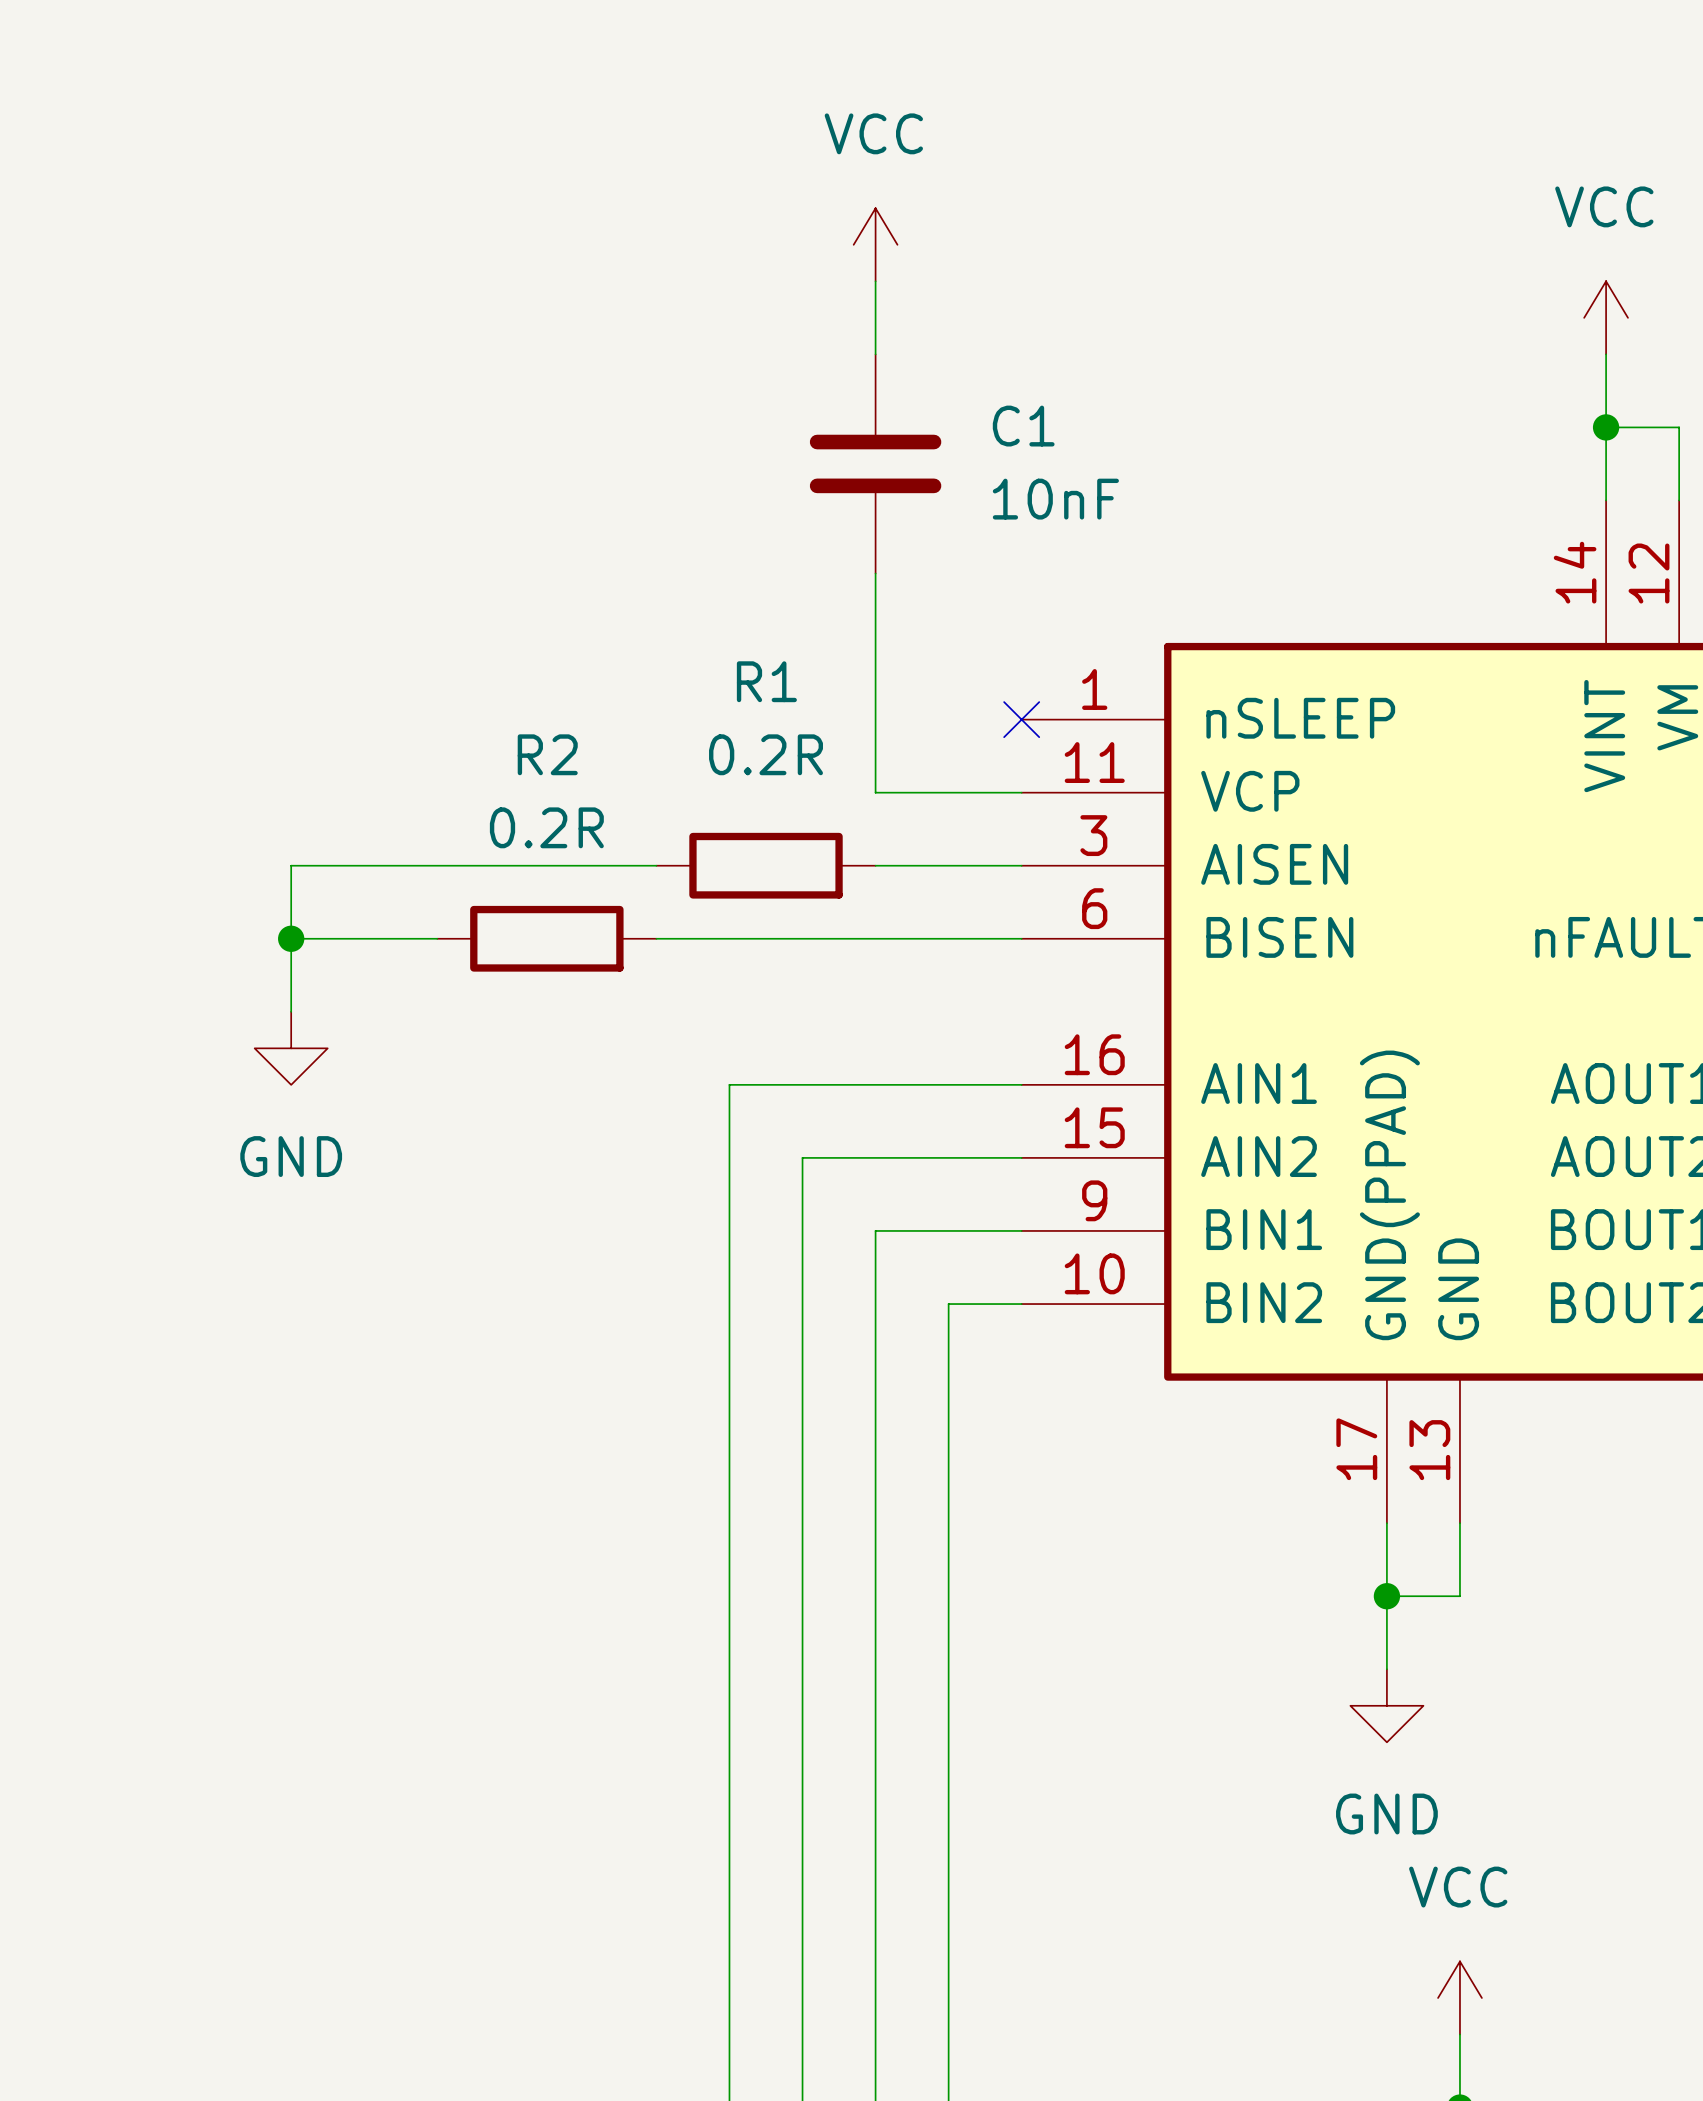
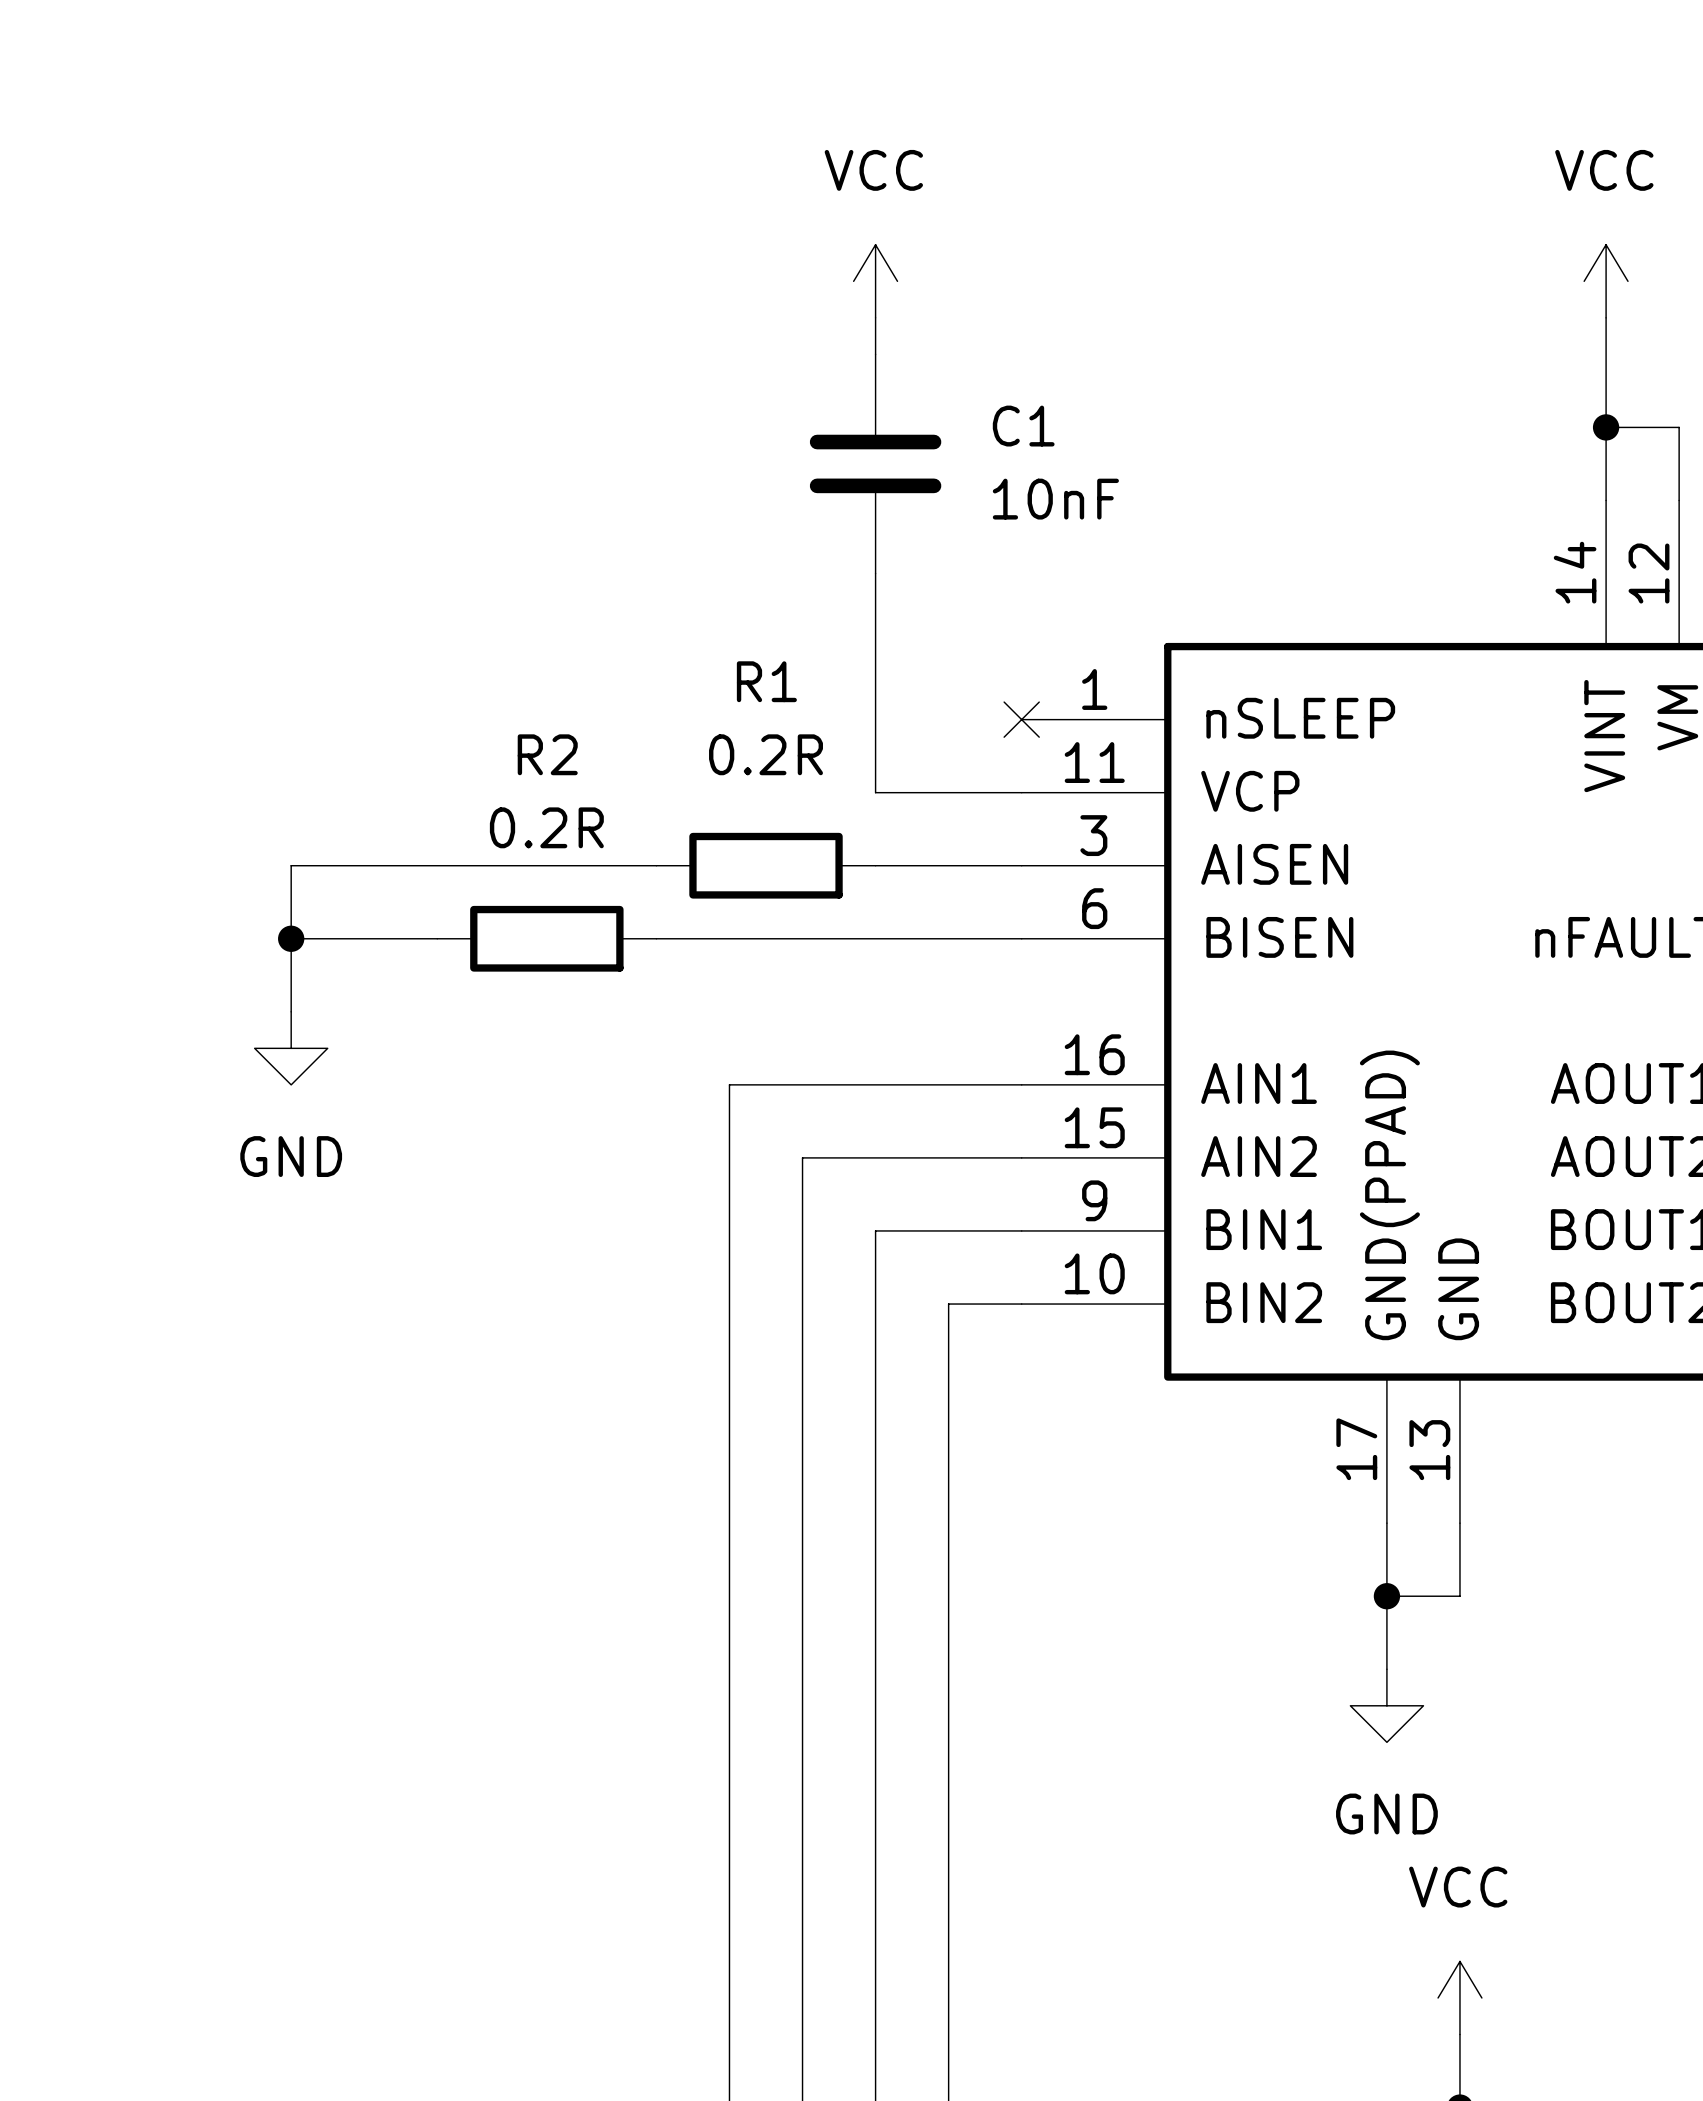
power symbol position: VCC (875, 244) -> VCC (875, 281)
power symbol position: VCC (1606, 317) -> VCC (1606, 281)

